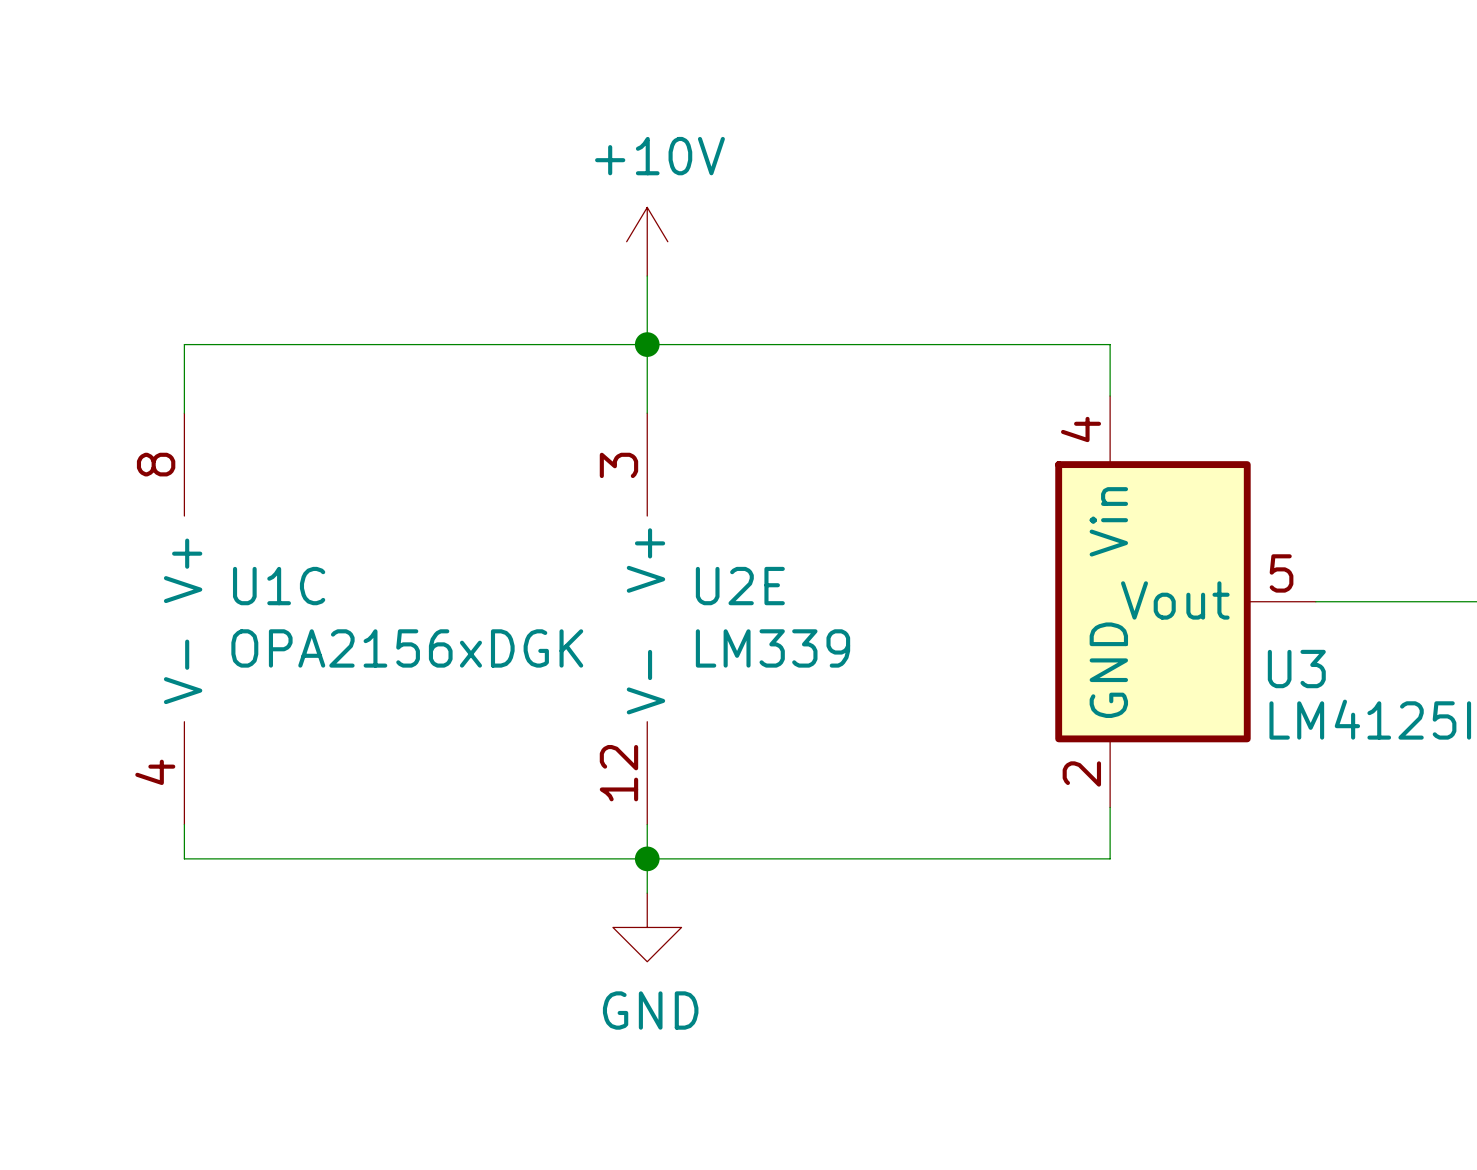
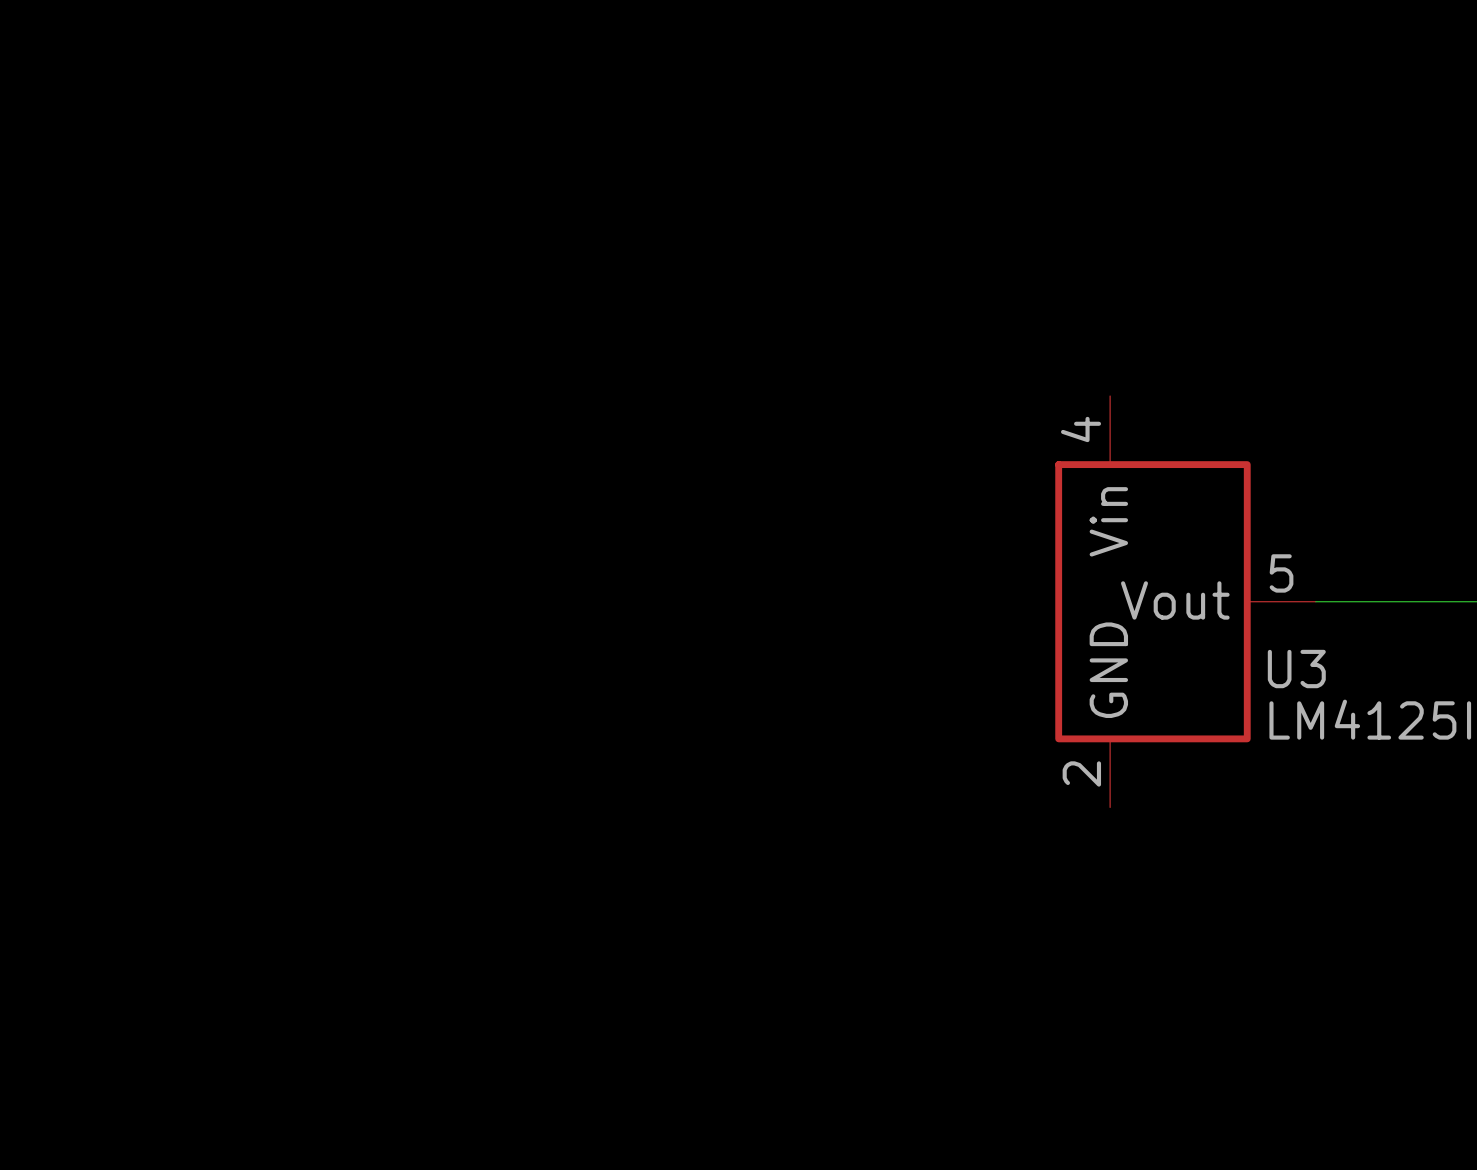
power symbol: +10V (647, 241) -> none
wire: (647, 276) (647, 413) -> none
junction: (647, 344) -> none
wire: (1110, 396) (1110, 344) (184, 344) (184, 413) -> none
U1C: OPA2156xDGK (184, 618) -> none
U2E: LM339 (647, 618) -> none
wire: (1110, 807) (1110, 858) (184, 858) (184, 824) -> none
wire: (647, 824) (647, 893) -> none
junction: (647, 858) -> none
power symbol: GND (647, 927) -> none

